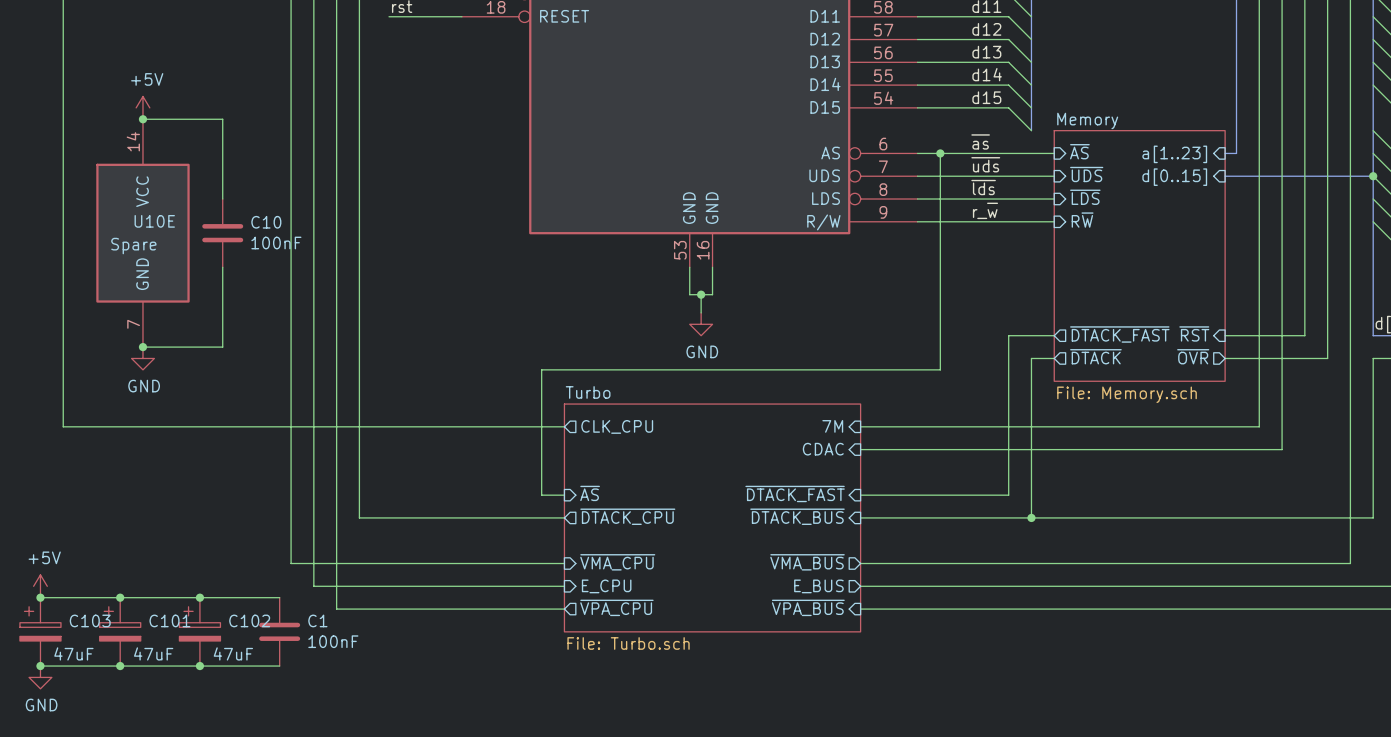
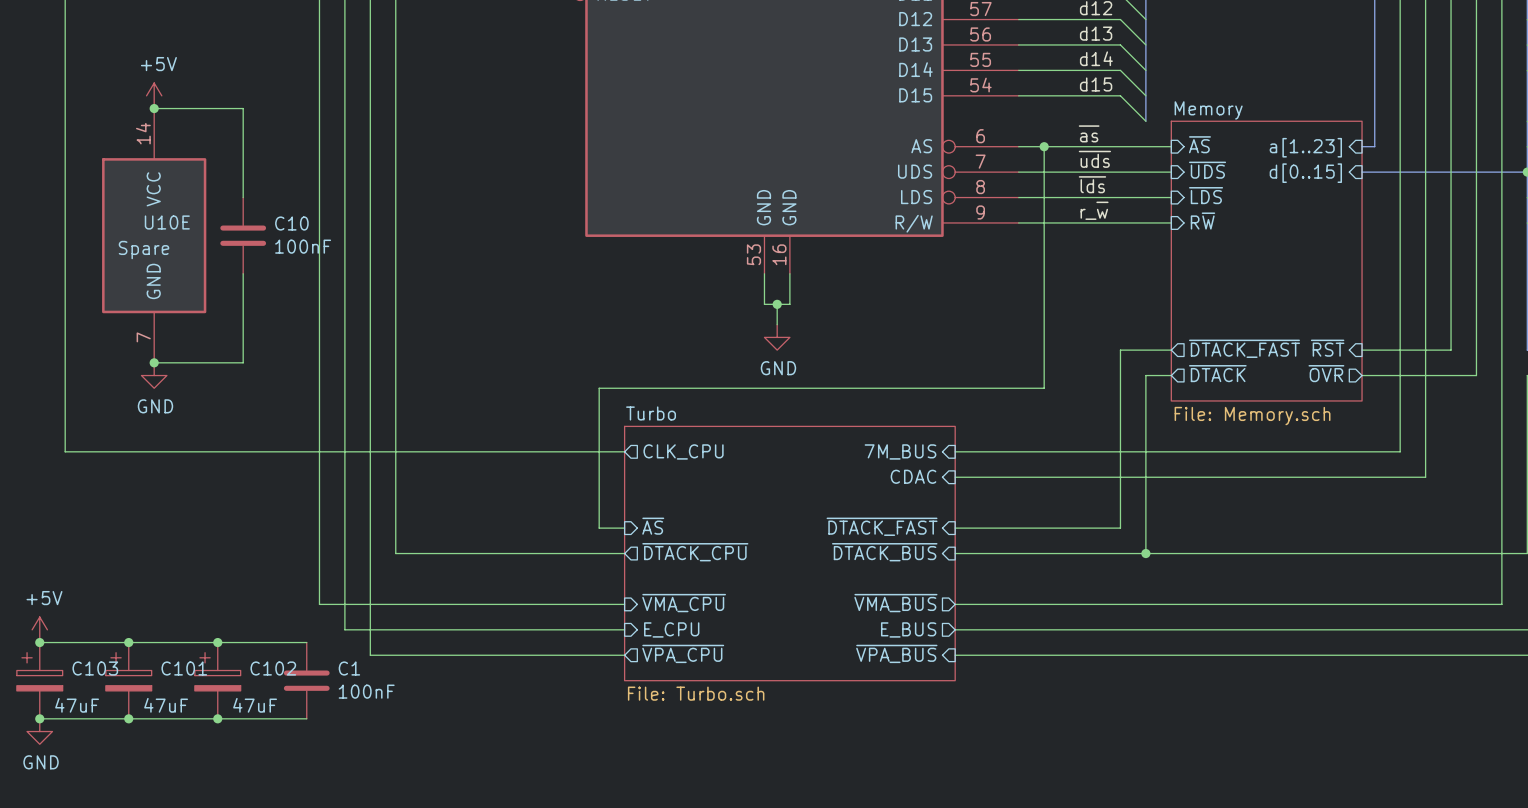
sheet pin: 7M (832, 426) -> 7M_BUS (900, 451)

